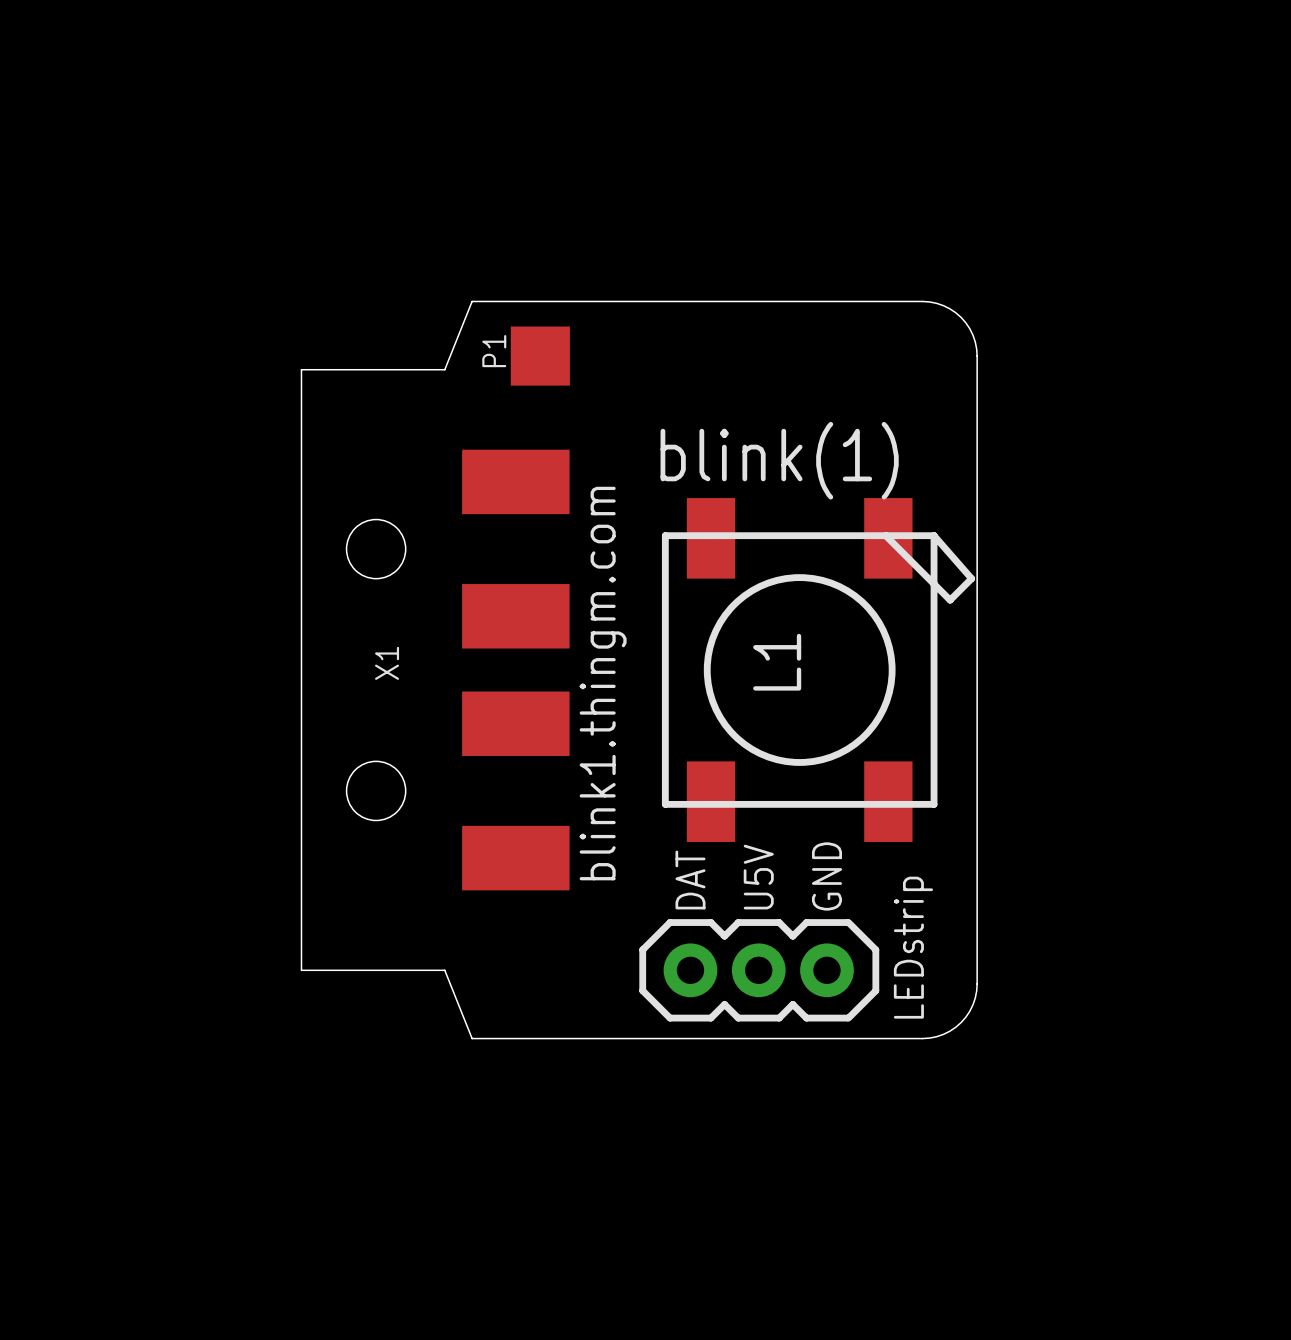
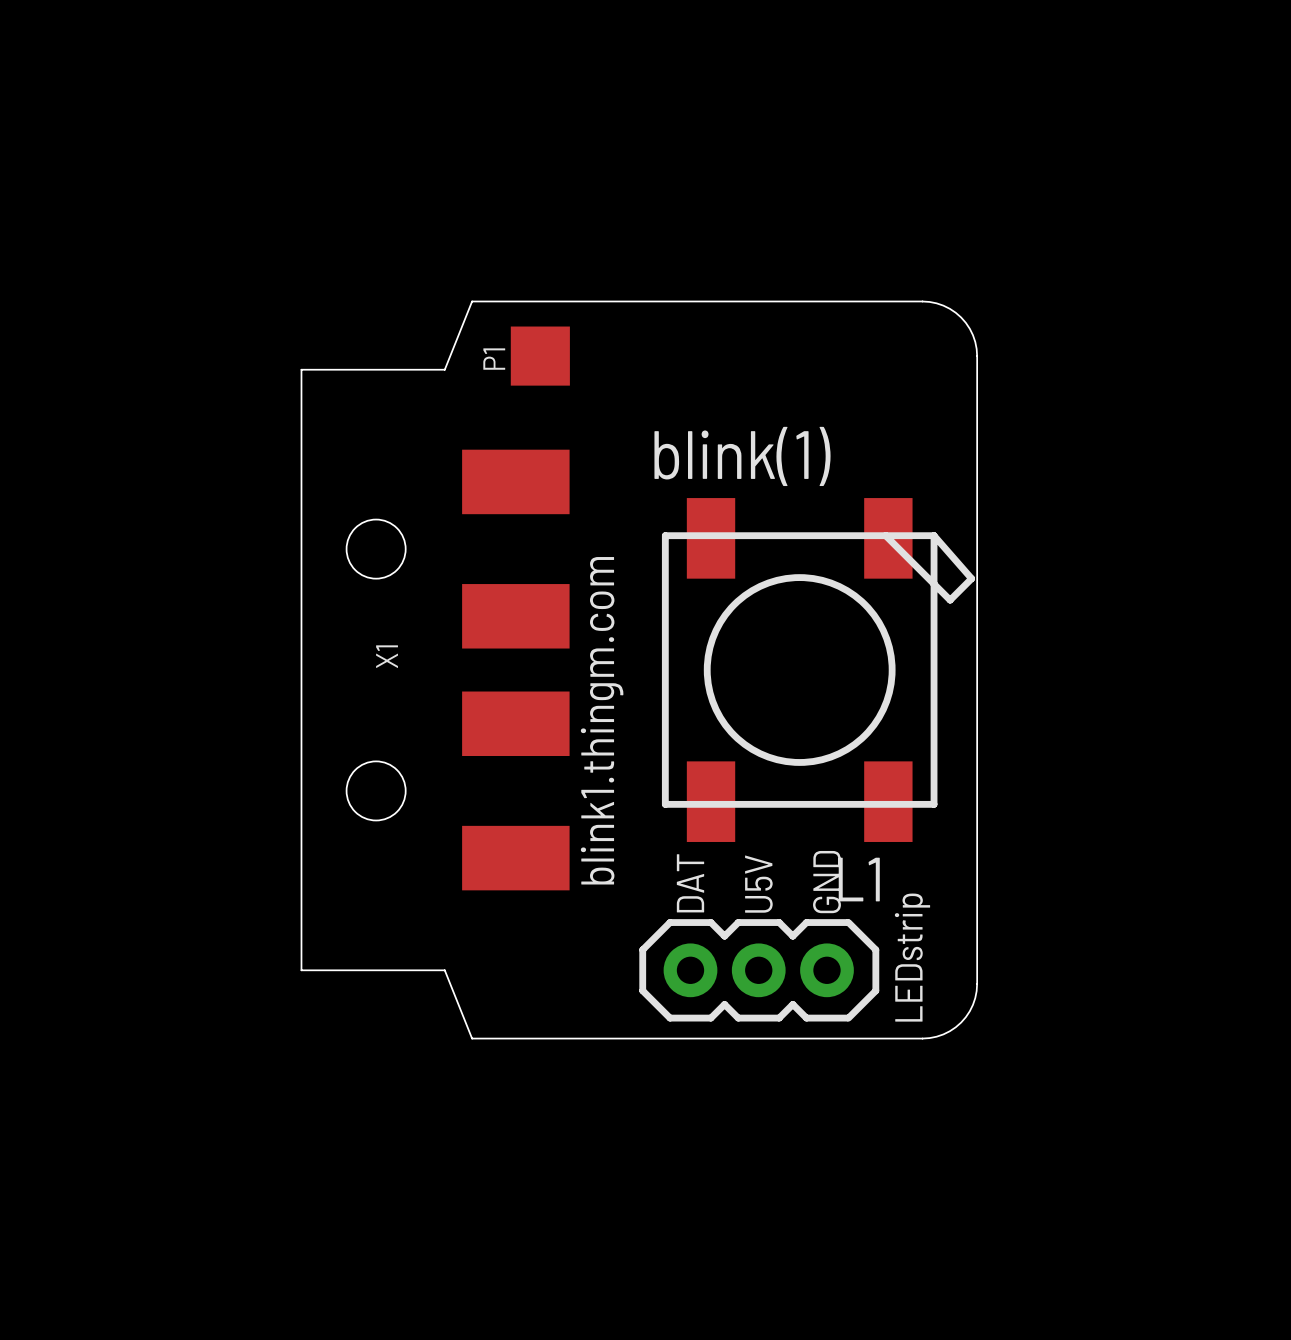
L1 name rotation: 0° (777, 662) -> 90° clockwise (859, 879)
L1 name position: L1 (777, 662) -> L1 (859, 879)

